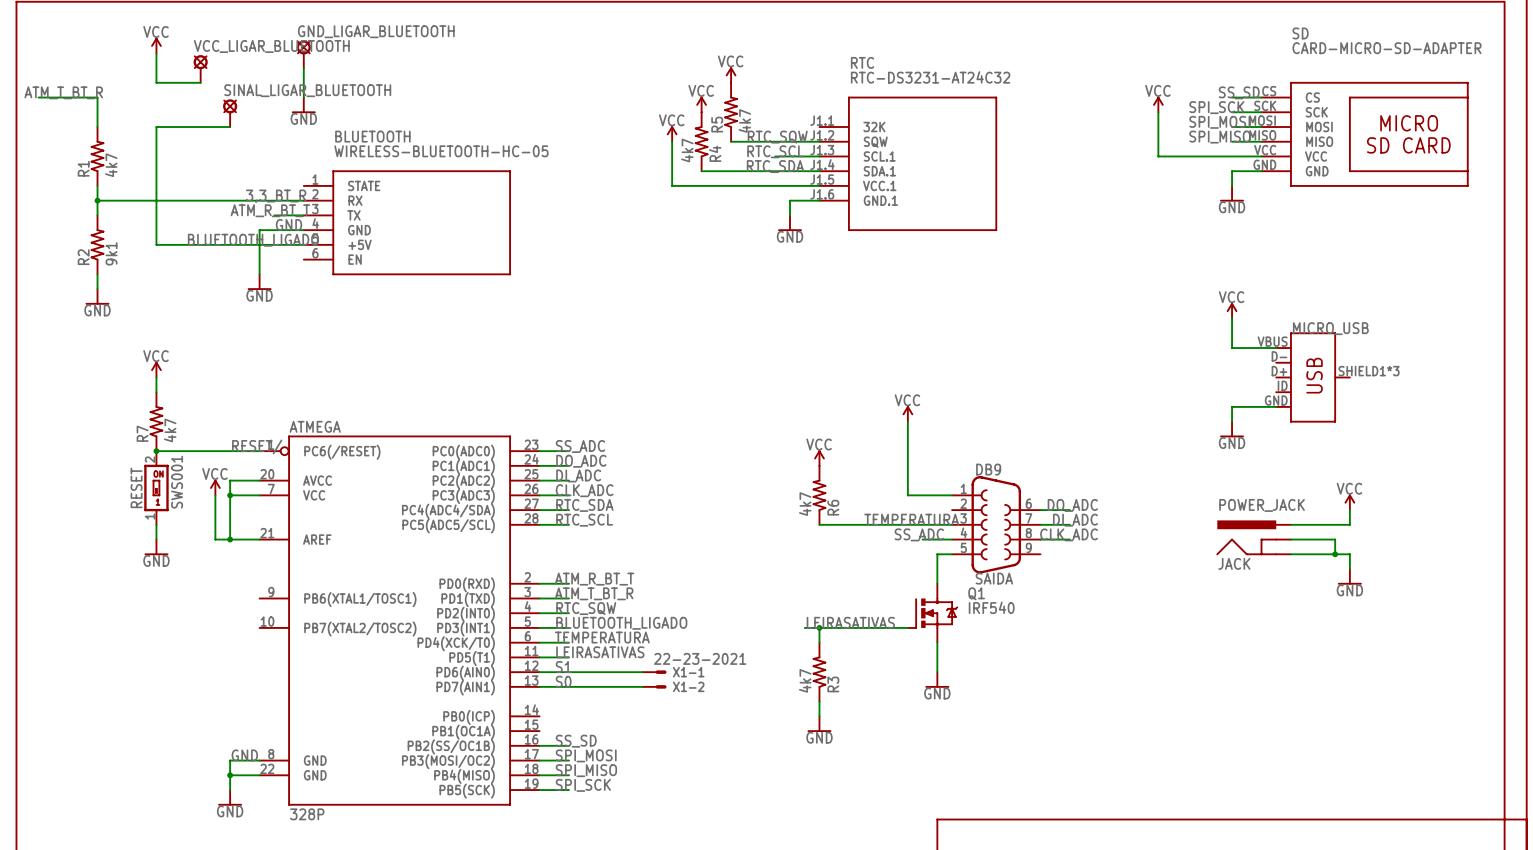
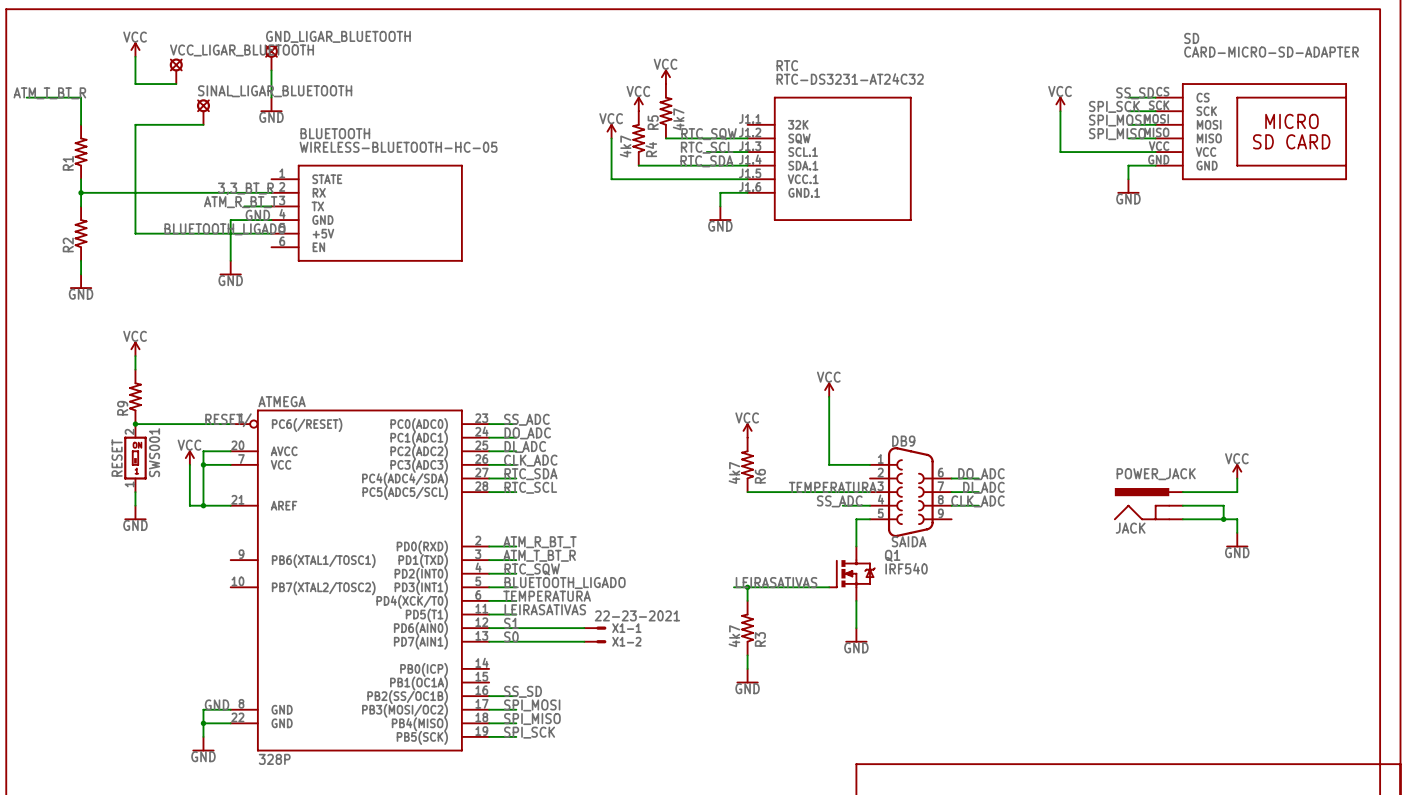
R1 value: 4k7 (111, 165) -> none
R2 value: 9k1 (111, 253) -> none
power symbol: VCC (1232, 310) -> none
wire: (1232, 318) (1232, 348) (1276, 348) -> none
MICRO_USB: (1313, 377) -> none
wire: (1276, 406) (1232, 406) (1232, 421) -> none
power symbol: GND (1232, 429) -> none
R7 value: 4k7 (170, 430) -> none
R7 name: R7 (142, 433) -> R9 (122, 408)

